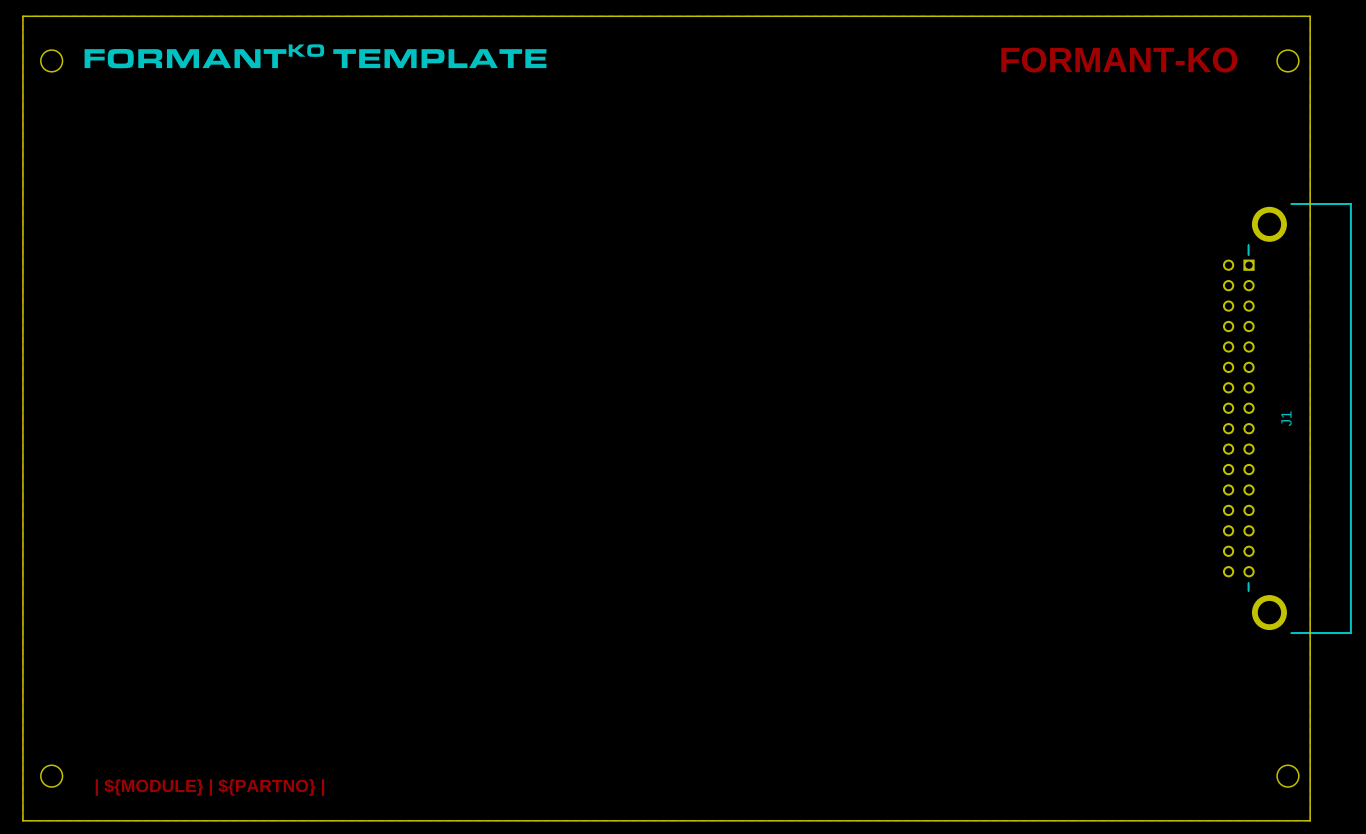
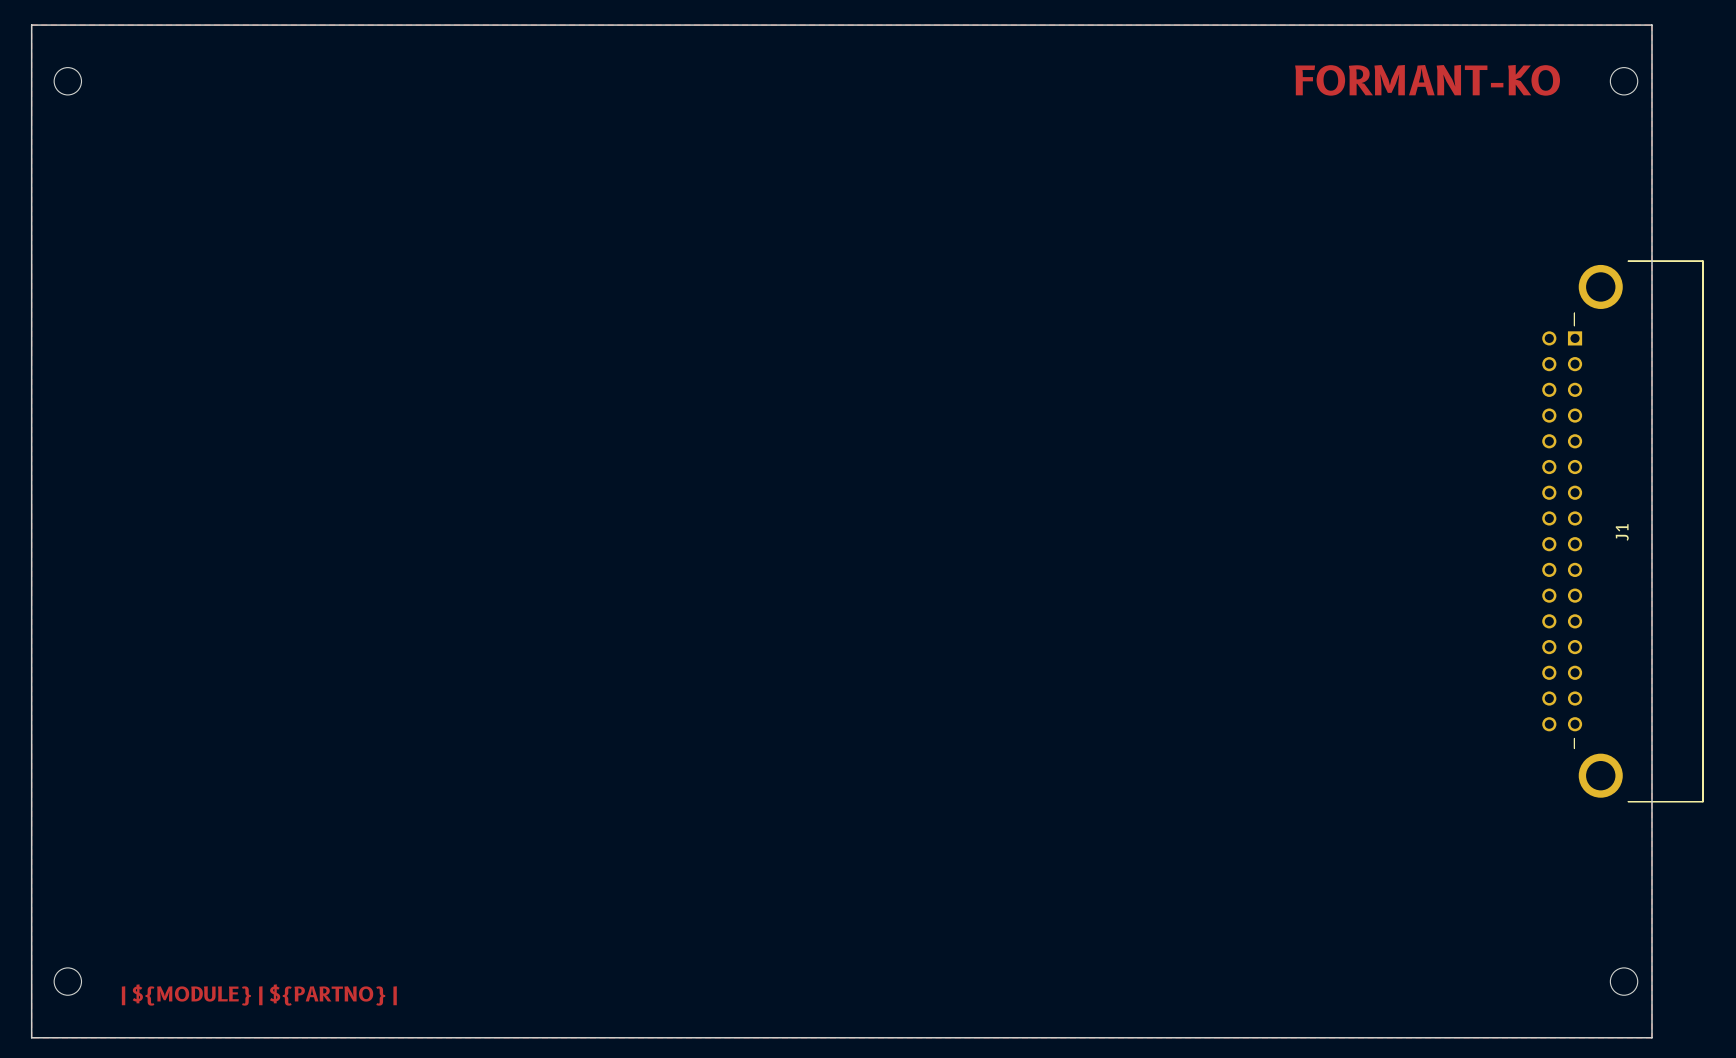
drawing: [84, 44, 547, 69] -> none

